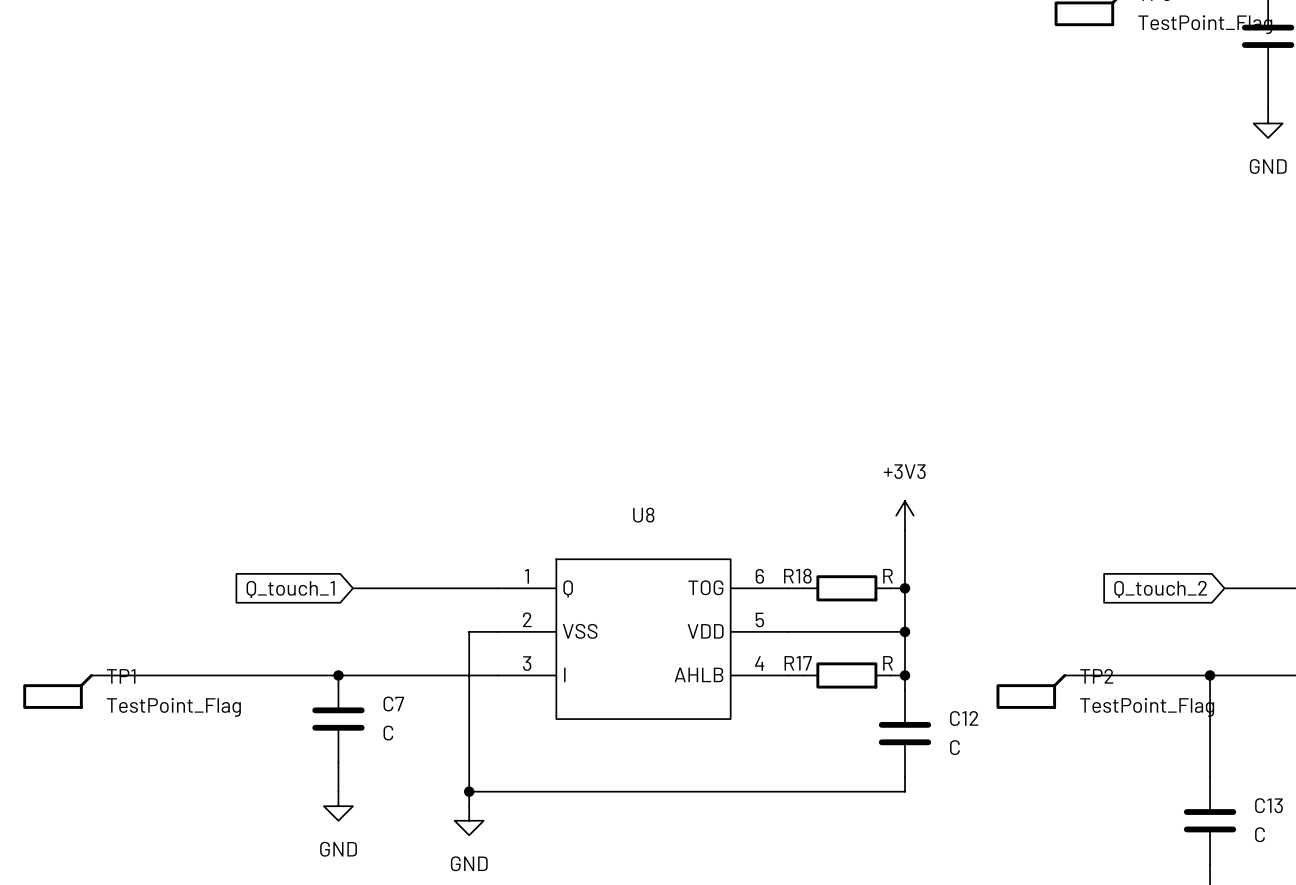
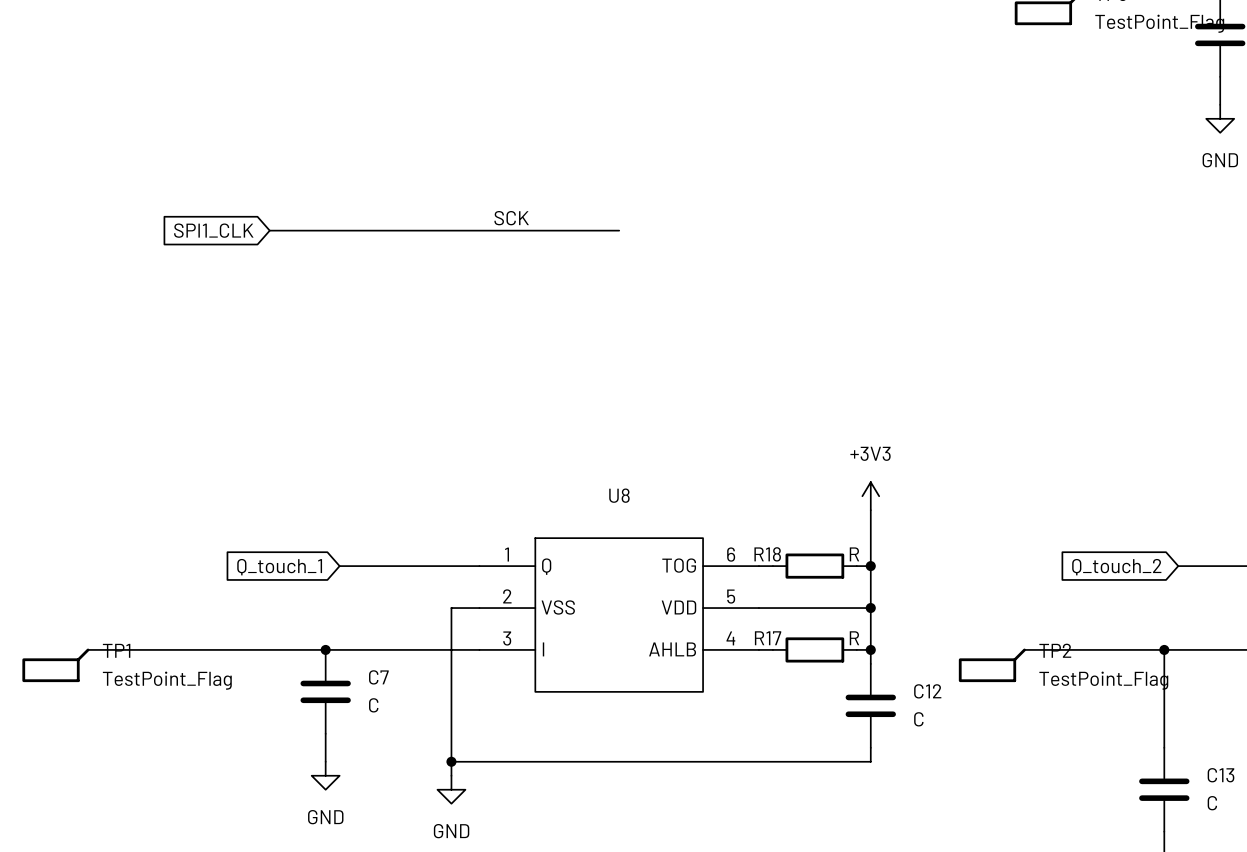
label: none -> SCK (511, 218)
global label: none -> SPI1_CLK (213, 230)
wire: none -> (269, 230) (619, 230)

